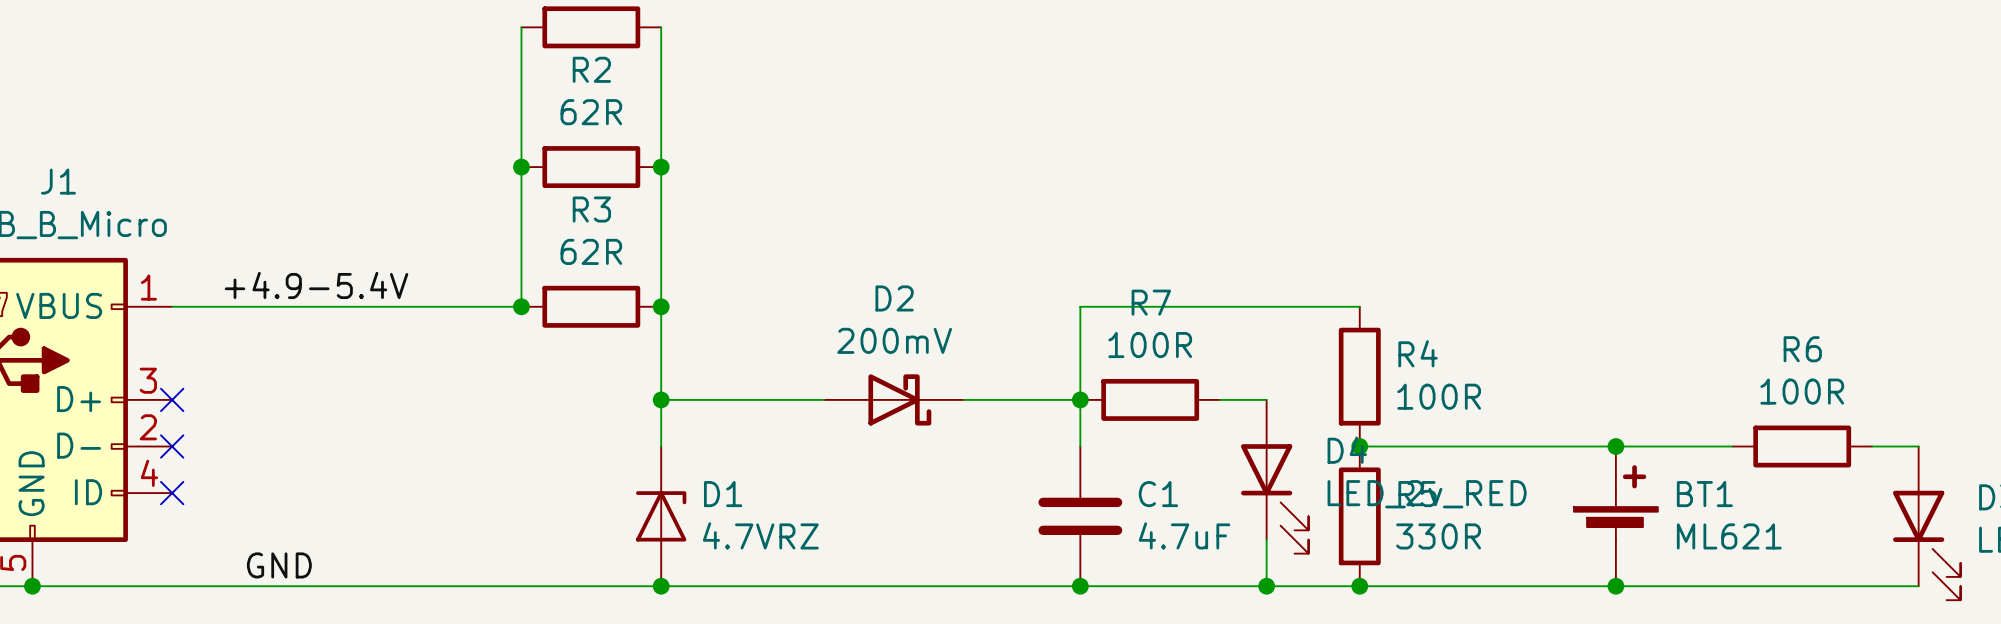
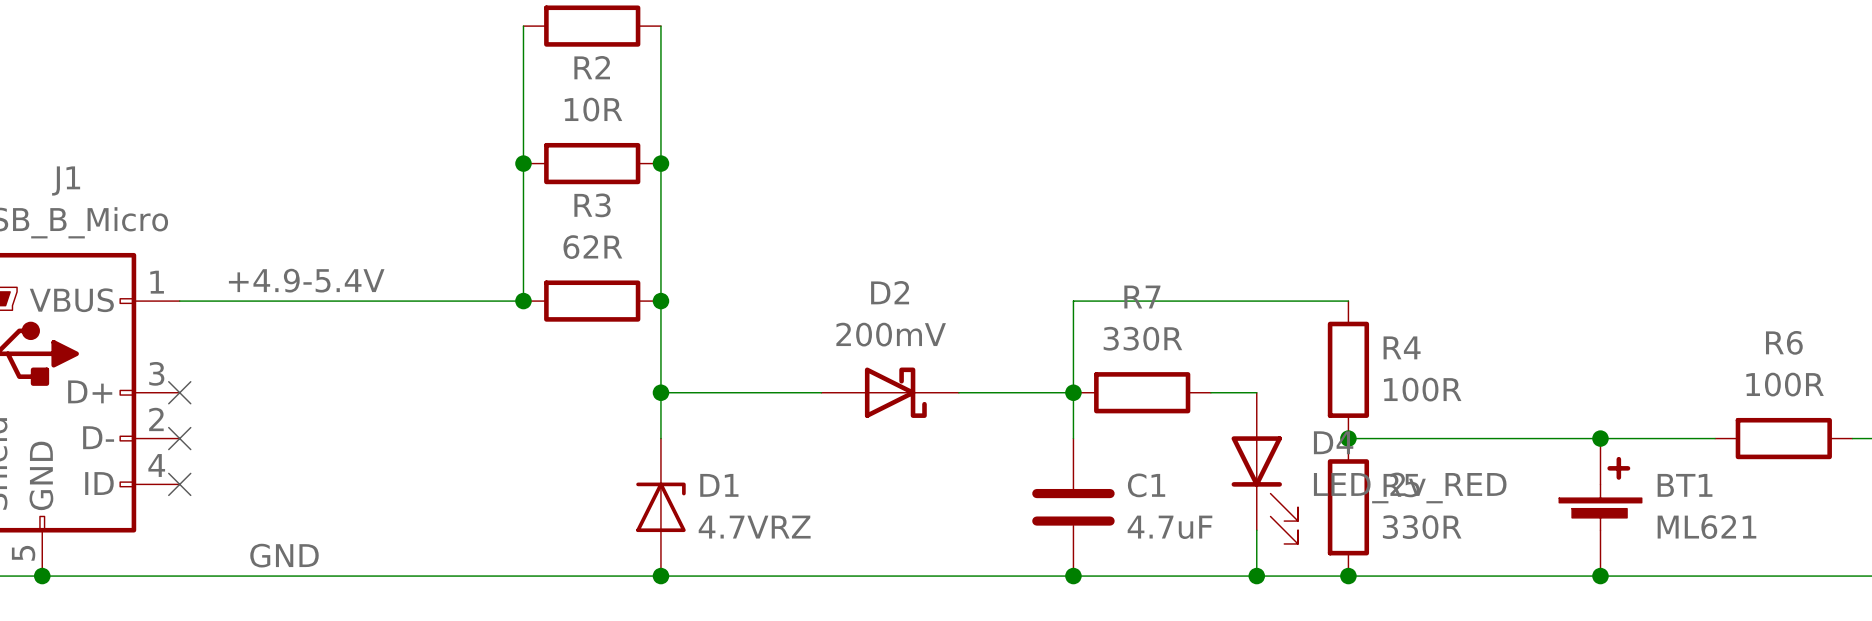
R2 value: 62R (591, 112) -> 10R (593, 109)
R7 value: 100R (1150, 345) -> 330R (1142, 338)

